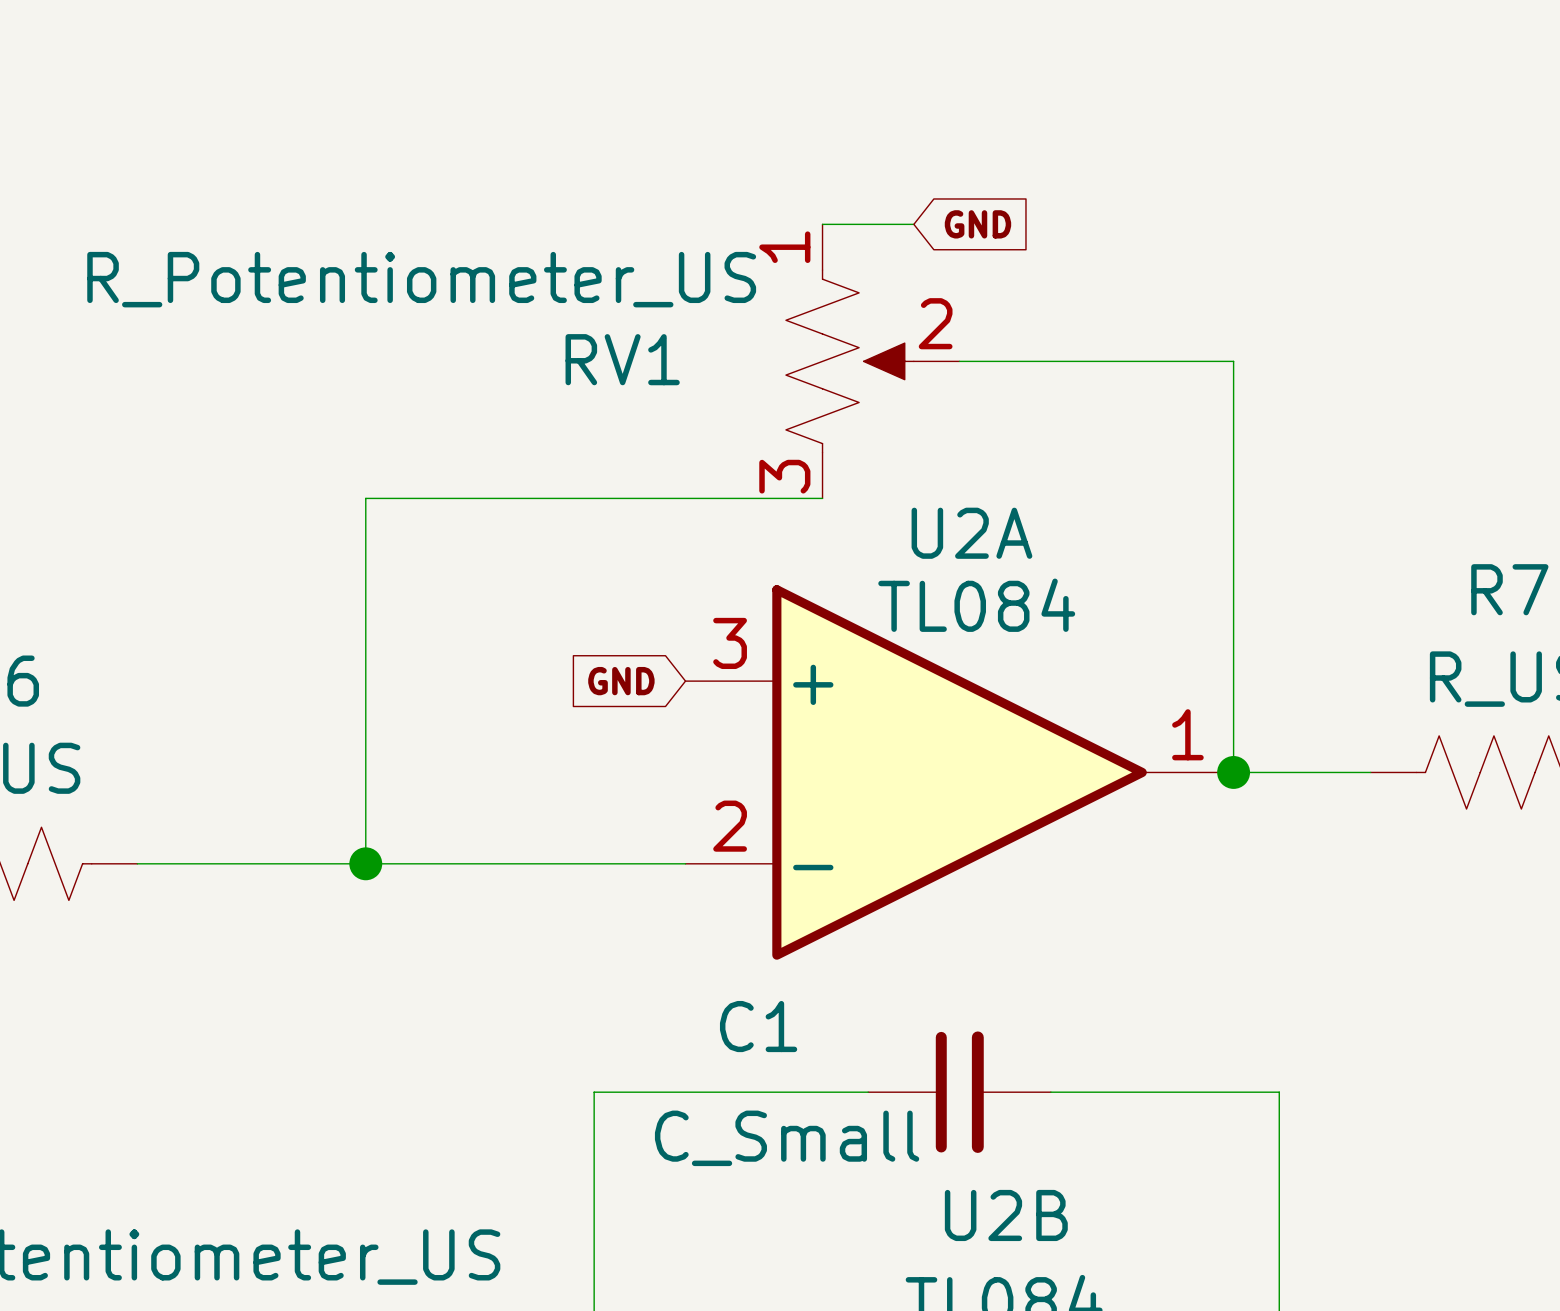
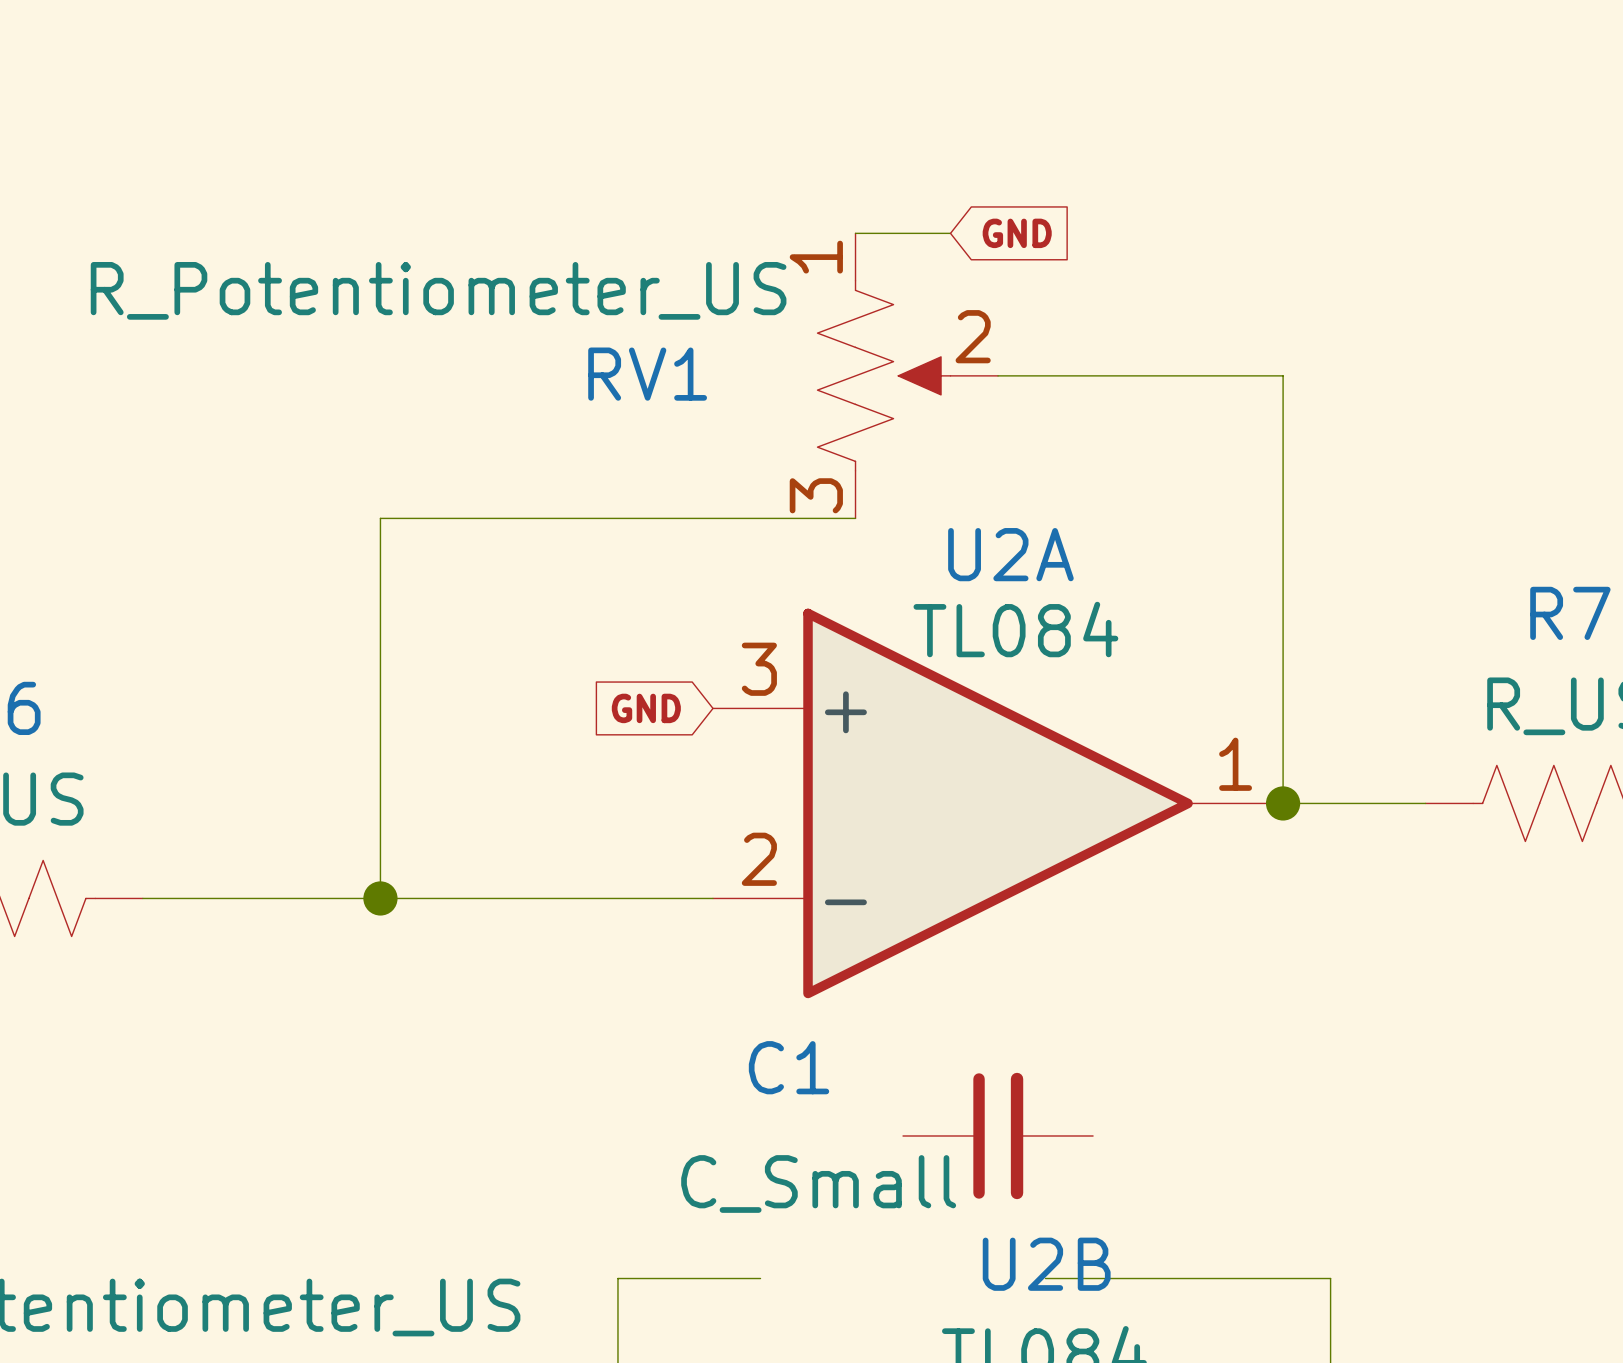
wire: (868, 1092) (594, 1092) (594, 1229) -> (760, 1278) (617, 1278)
wire: (1050, 1092) (1279, 1092) (1279, 1229) -> (1045, 1278) (1330, 1278)

